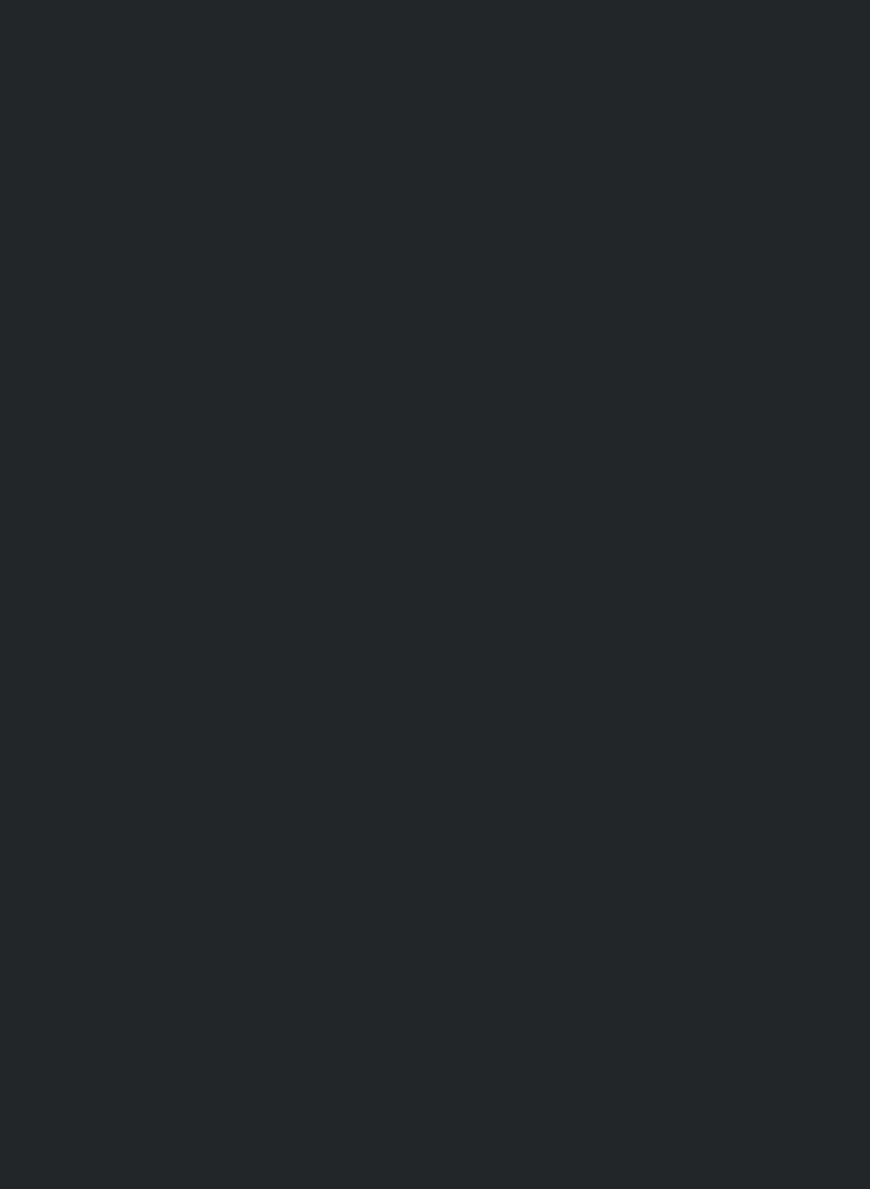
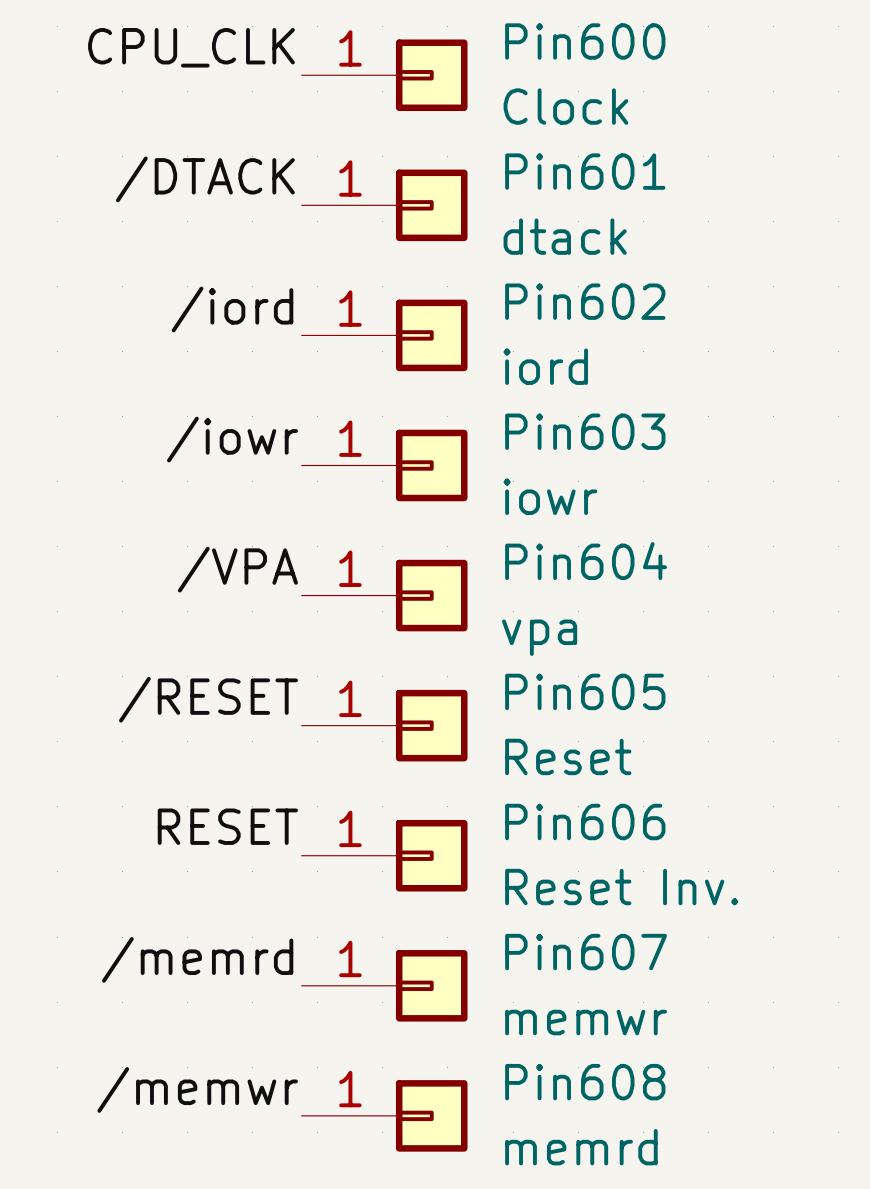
label: none -> CPU_CLK (191, 47)
Pin600: none -> Clock (384, 75)
label: none -> /DTACK (205, 179)
Pin601: none -> dtack (384, 205)
label: none -> /iord (232, 309)
Pin602: none -> iord (384, 335)
label: none -> /iowr (232, 439)
Pin603: none -> iowr (384, 465)
label: none -> /VPA (237, 569)
Pin604: none -> vpa (384, 595)
label: none -> /RESET (208, 699)
Pin605: none -> Reset (384, 725)
label: none -> RESET (227, 826)
Pin606: none -> Reset Inv. (384, 855)
label: none -> /memrd (197, 959)
Pin607: none -> memwr (384, 985)
label: none -> /memwr (197, 1089)
Pin608: none -> memrd (384, 1115)

